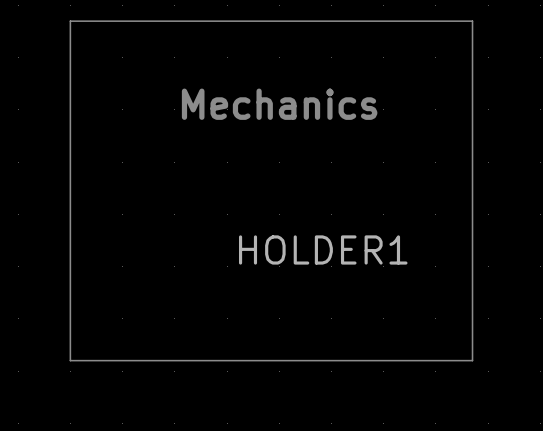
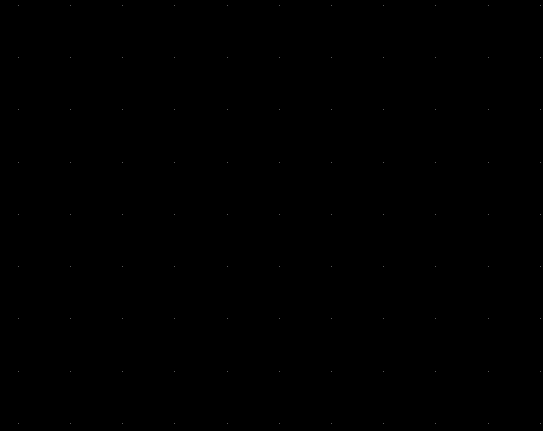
line: (70, 21) (472, 21) (472, 360) (70, 360) (70, 21) -> none
text: Mechanics (279, 104) -> none
HOLDER1: (323, 249) -> none

